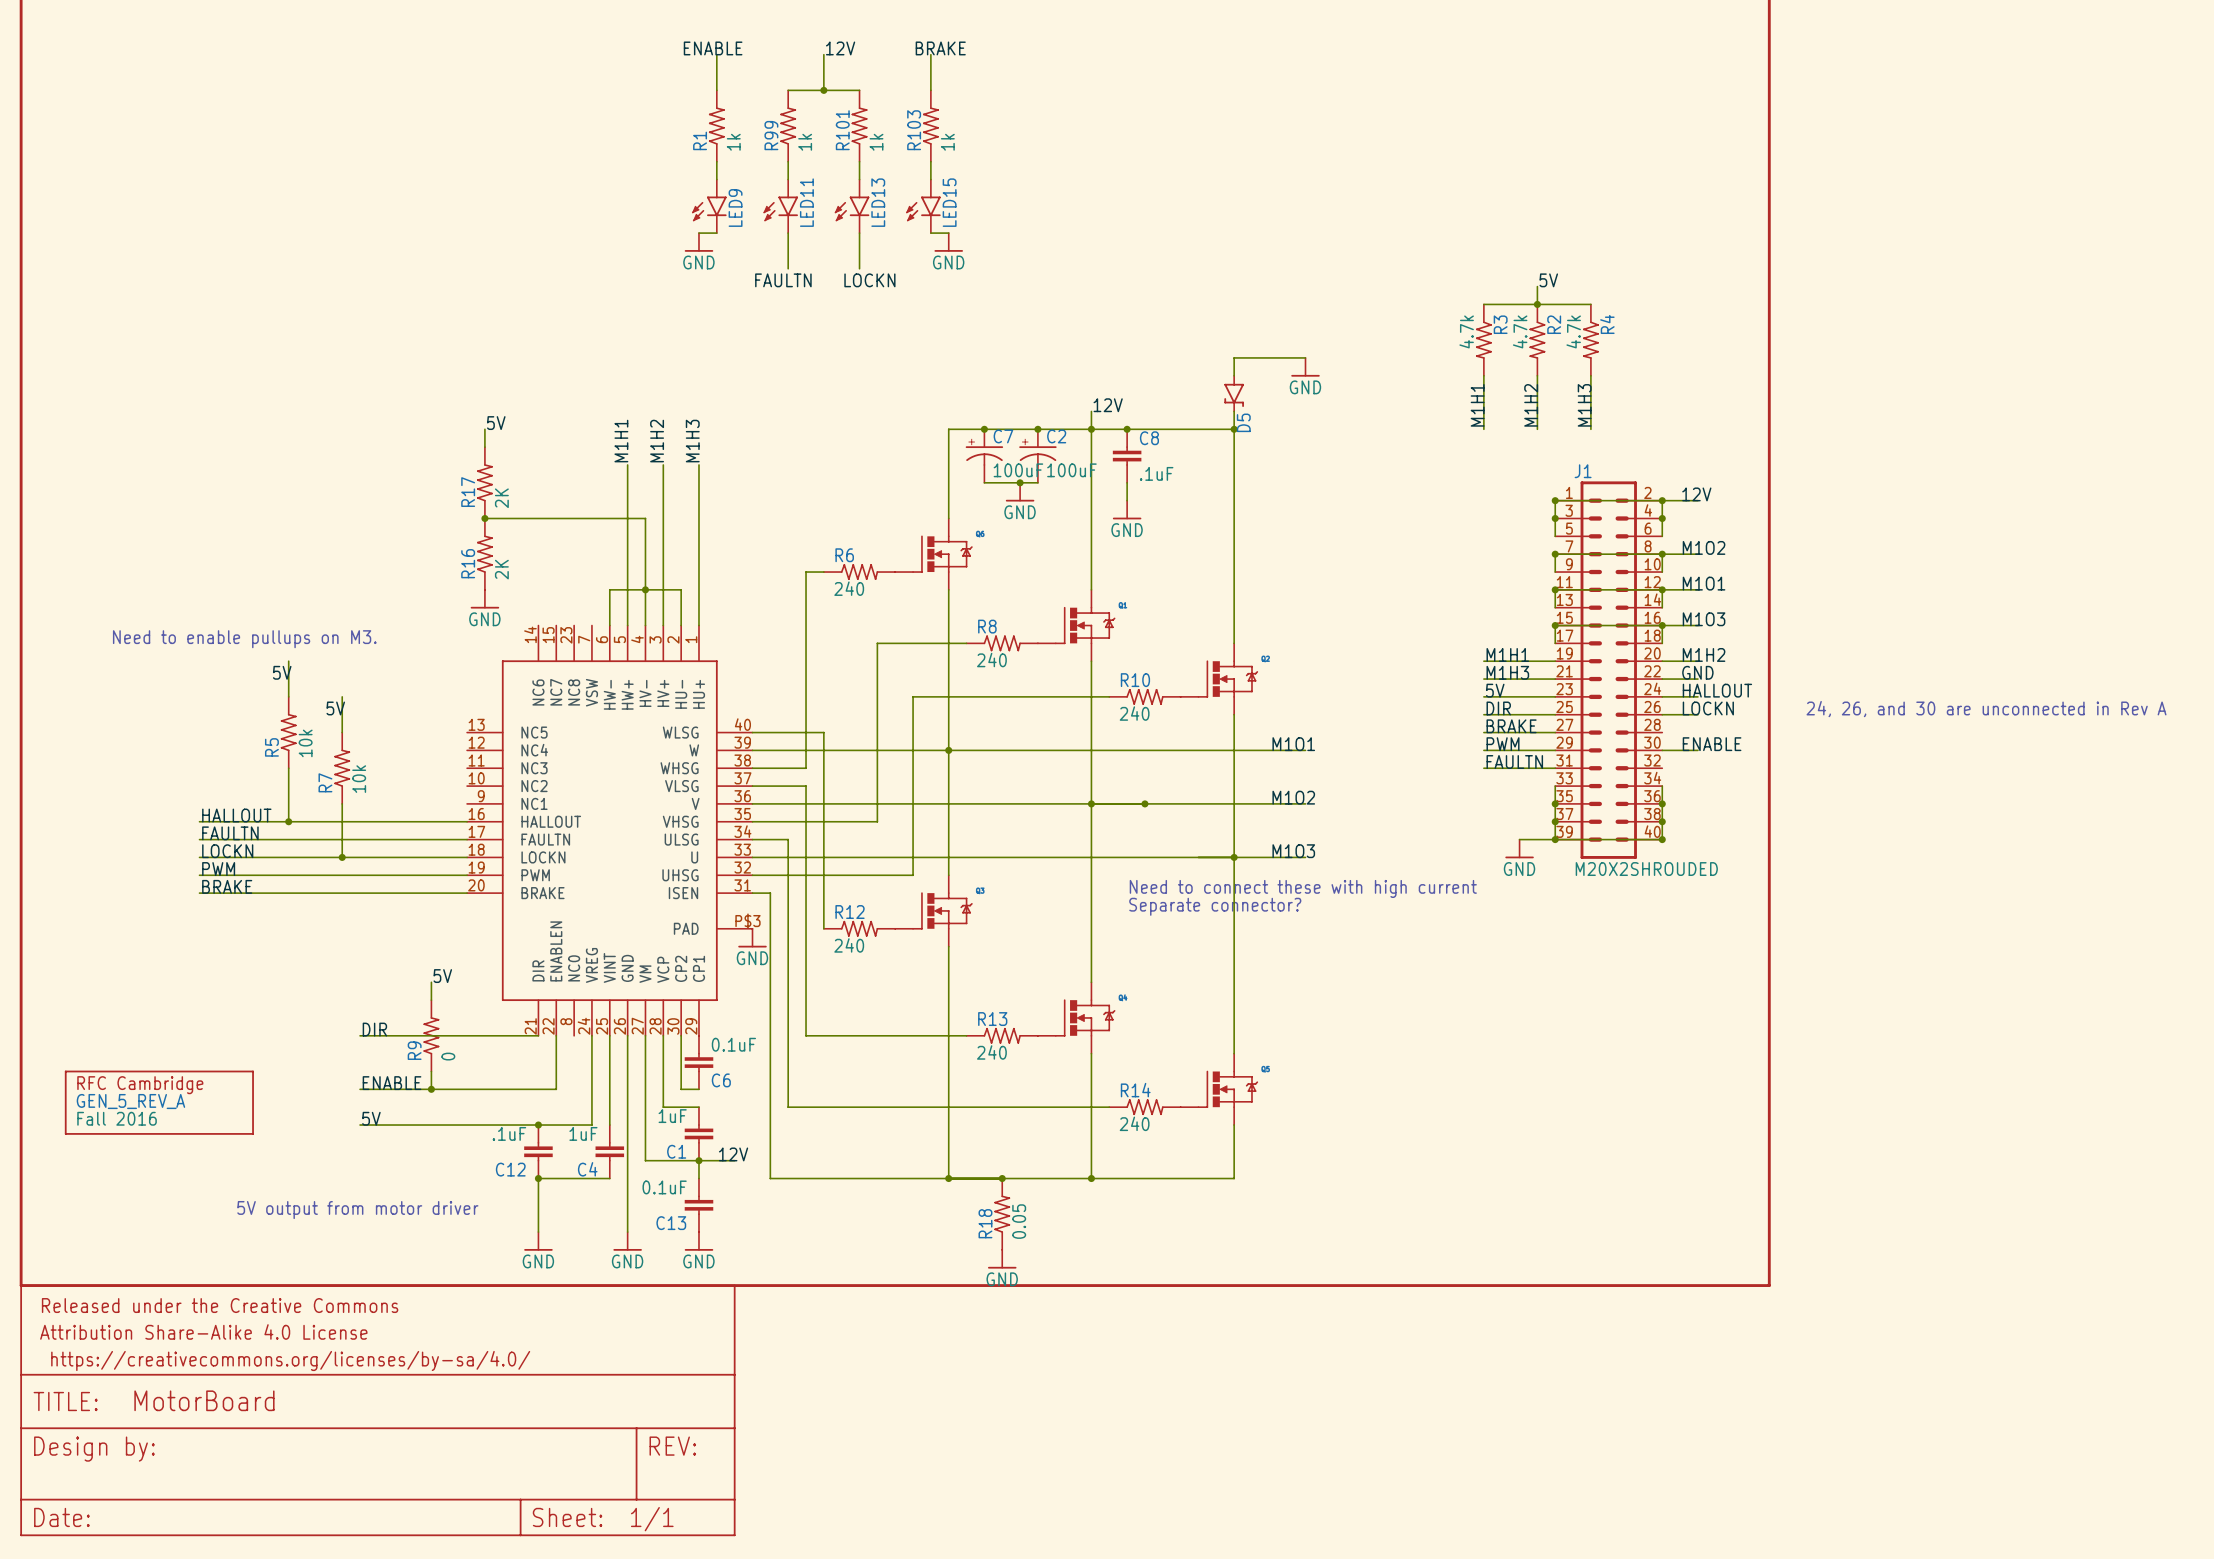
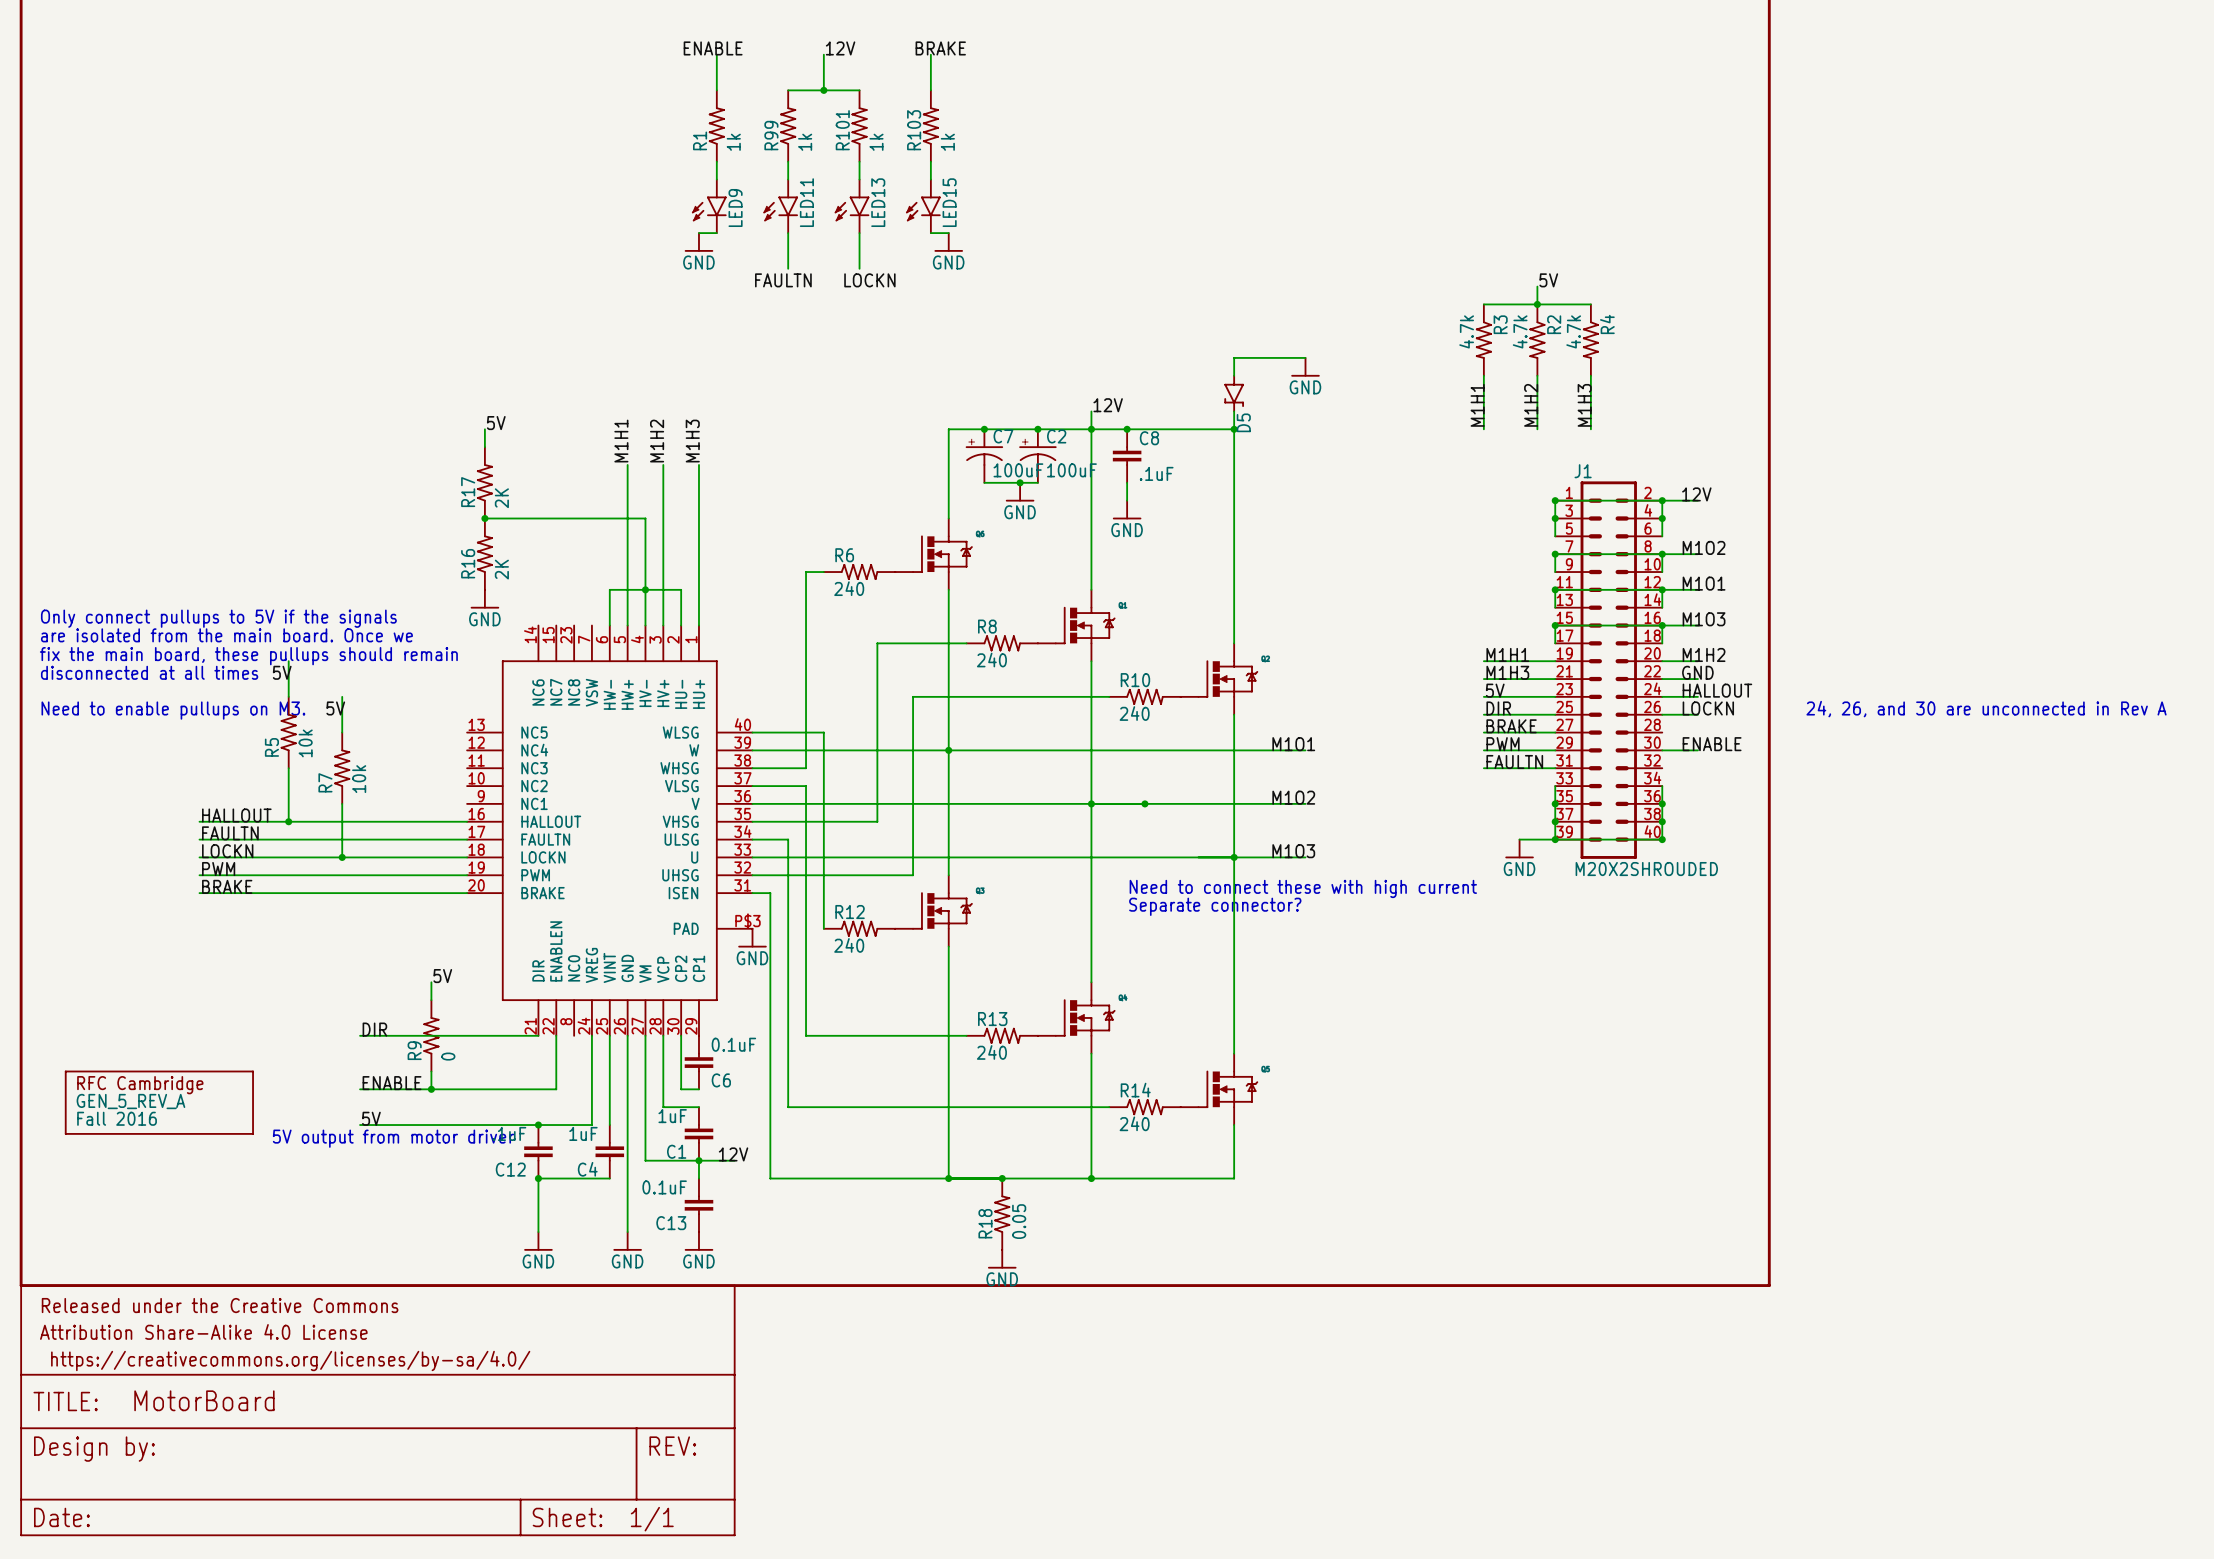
text: none -> Only connect pullups to 5V if the signals (218, 618)
text: none -> are isolated from the main board. Once we (226, 635)
text position: Need to enable pullups on M3. (244, 639) -> Need to enable pullups on M3. (173, 710)
text: none -> fix the main board, these pullups should remain (248, 656)
text: none -> disconnected at all times (149, 672)
text position: 5V output from motor driver (357, 1210) -> 5V output from motor driver (393, 1138)

